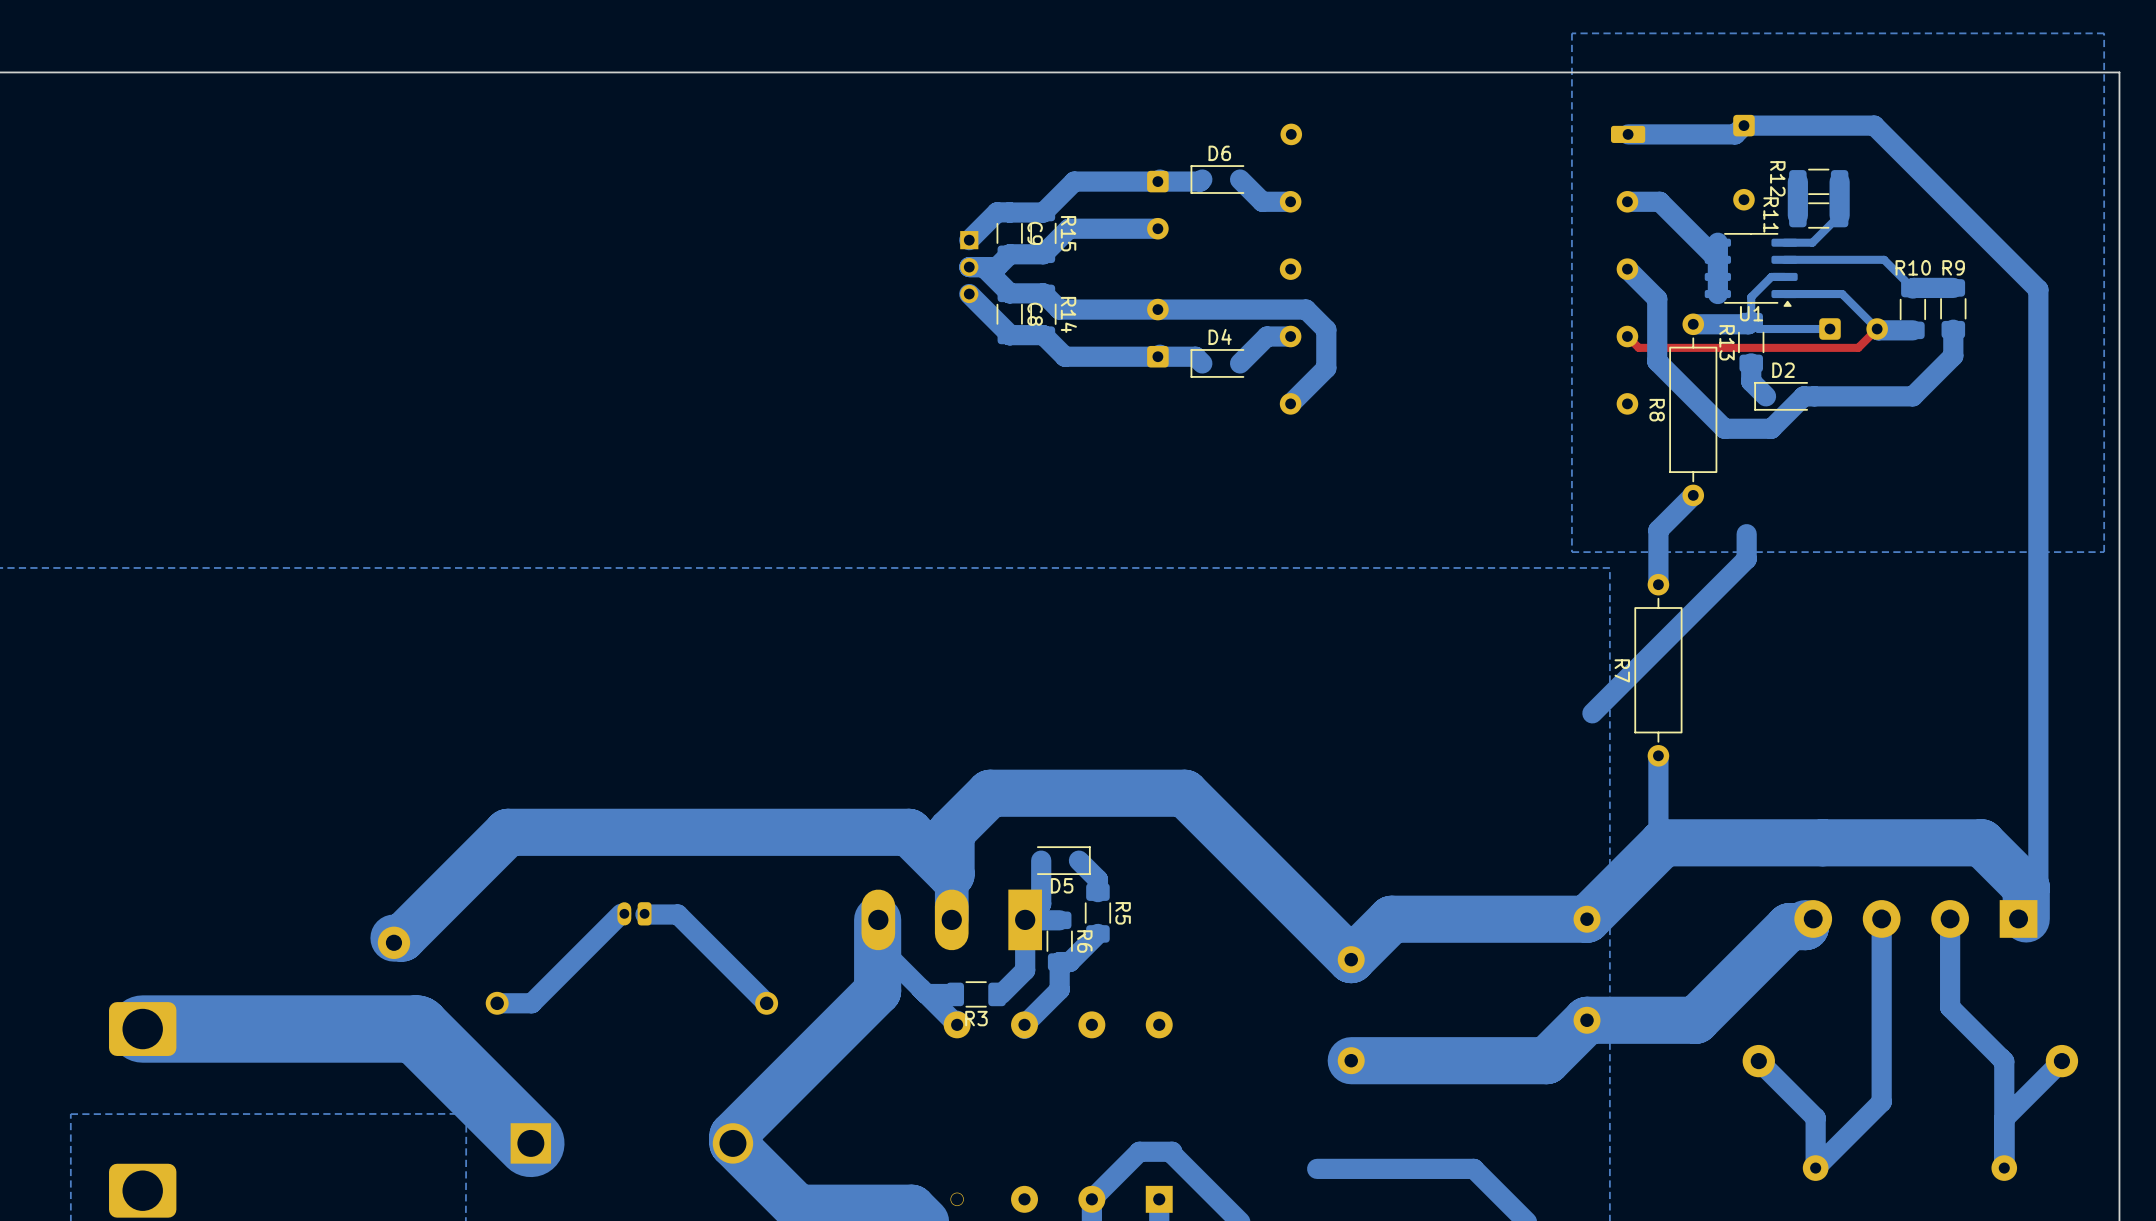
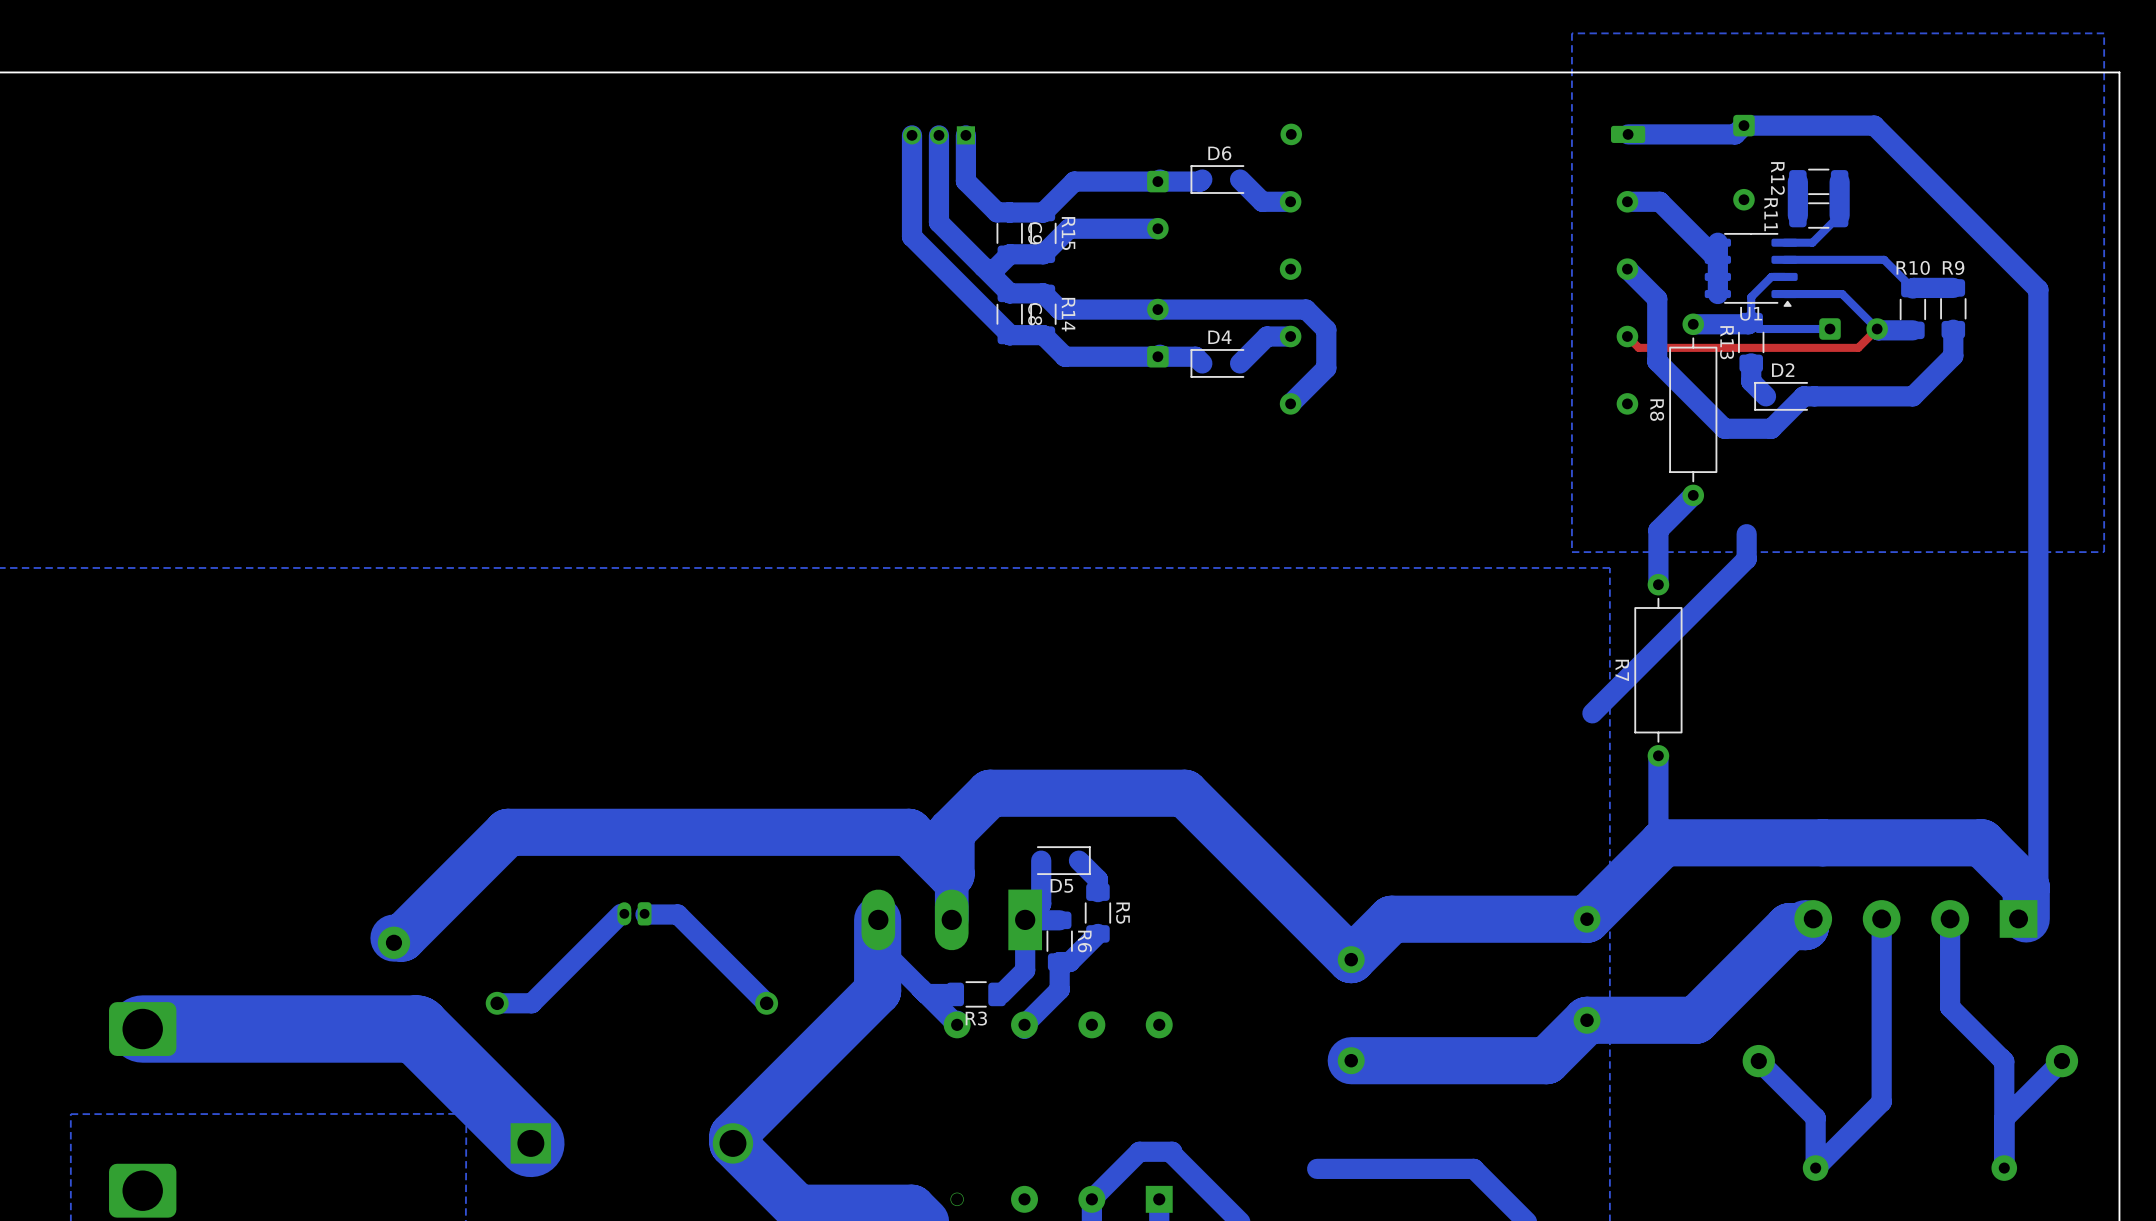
bottom track: none -> (912, 135) (912, 236) (969, 294)
bottom track: none -> (938, 135) (938, 222) (983, 267)
bottom track: (997, 212) (969, 240) -> (997, 212) (965, 181) (965, 135)
part rotation: 0° (969, 267) -> 90° clockwise (938, 135)
part position: (969, 267) -> (938, 135)

